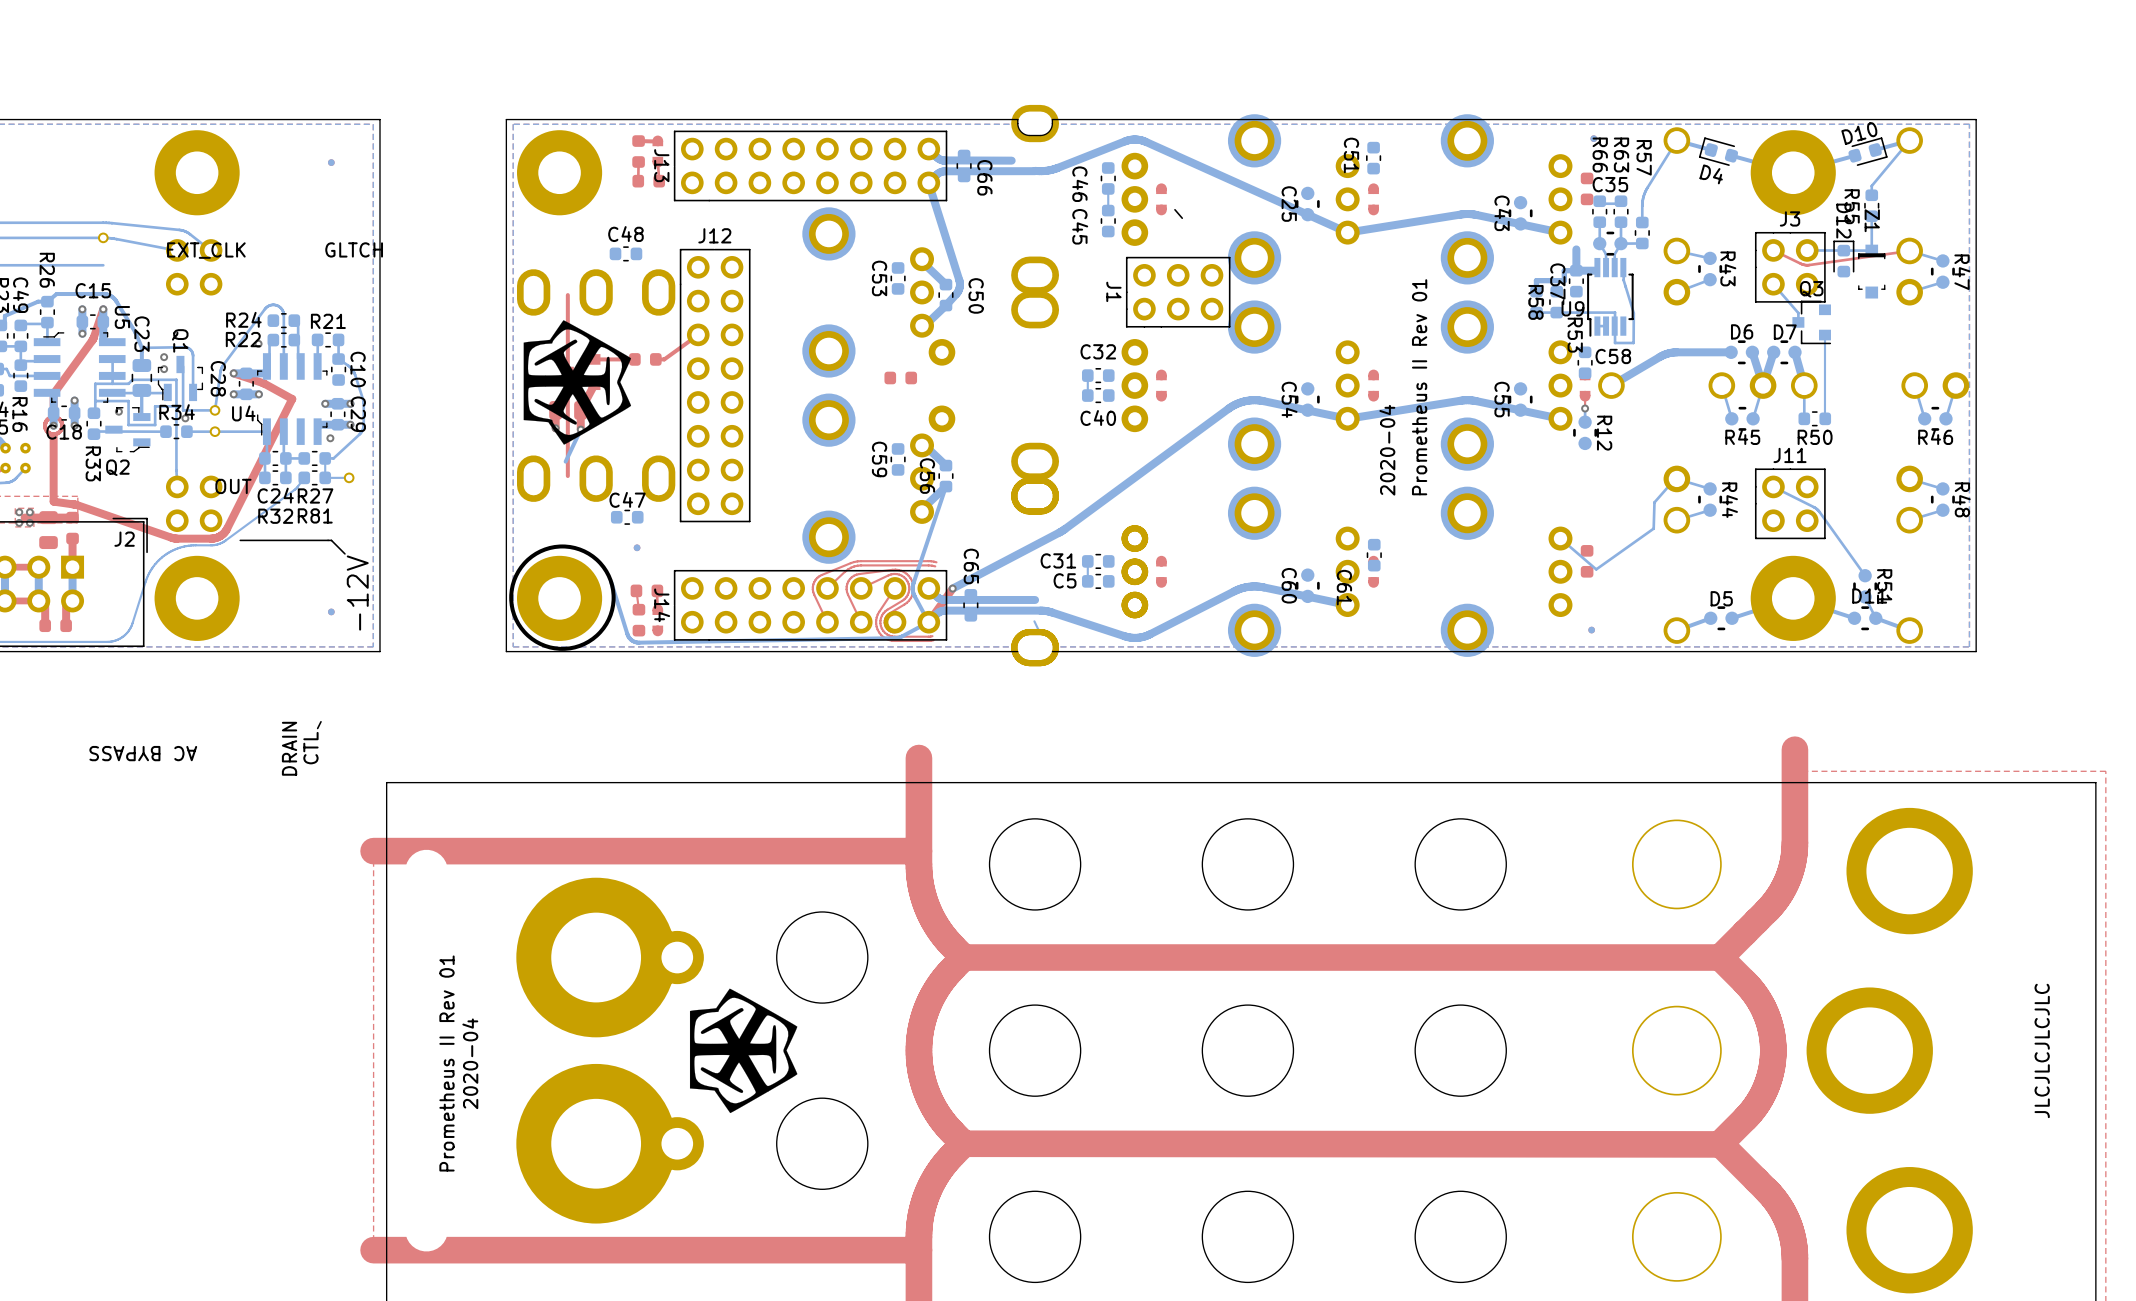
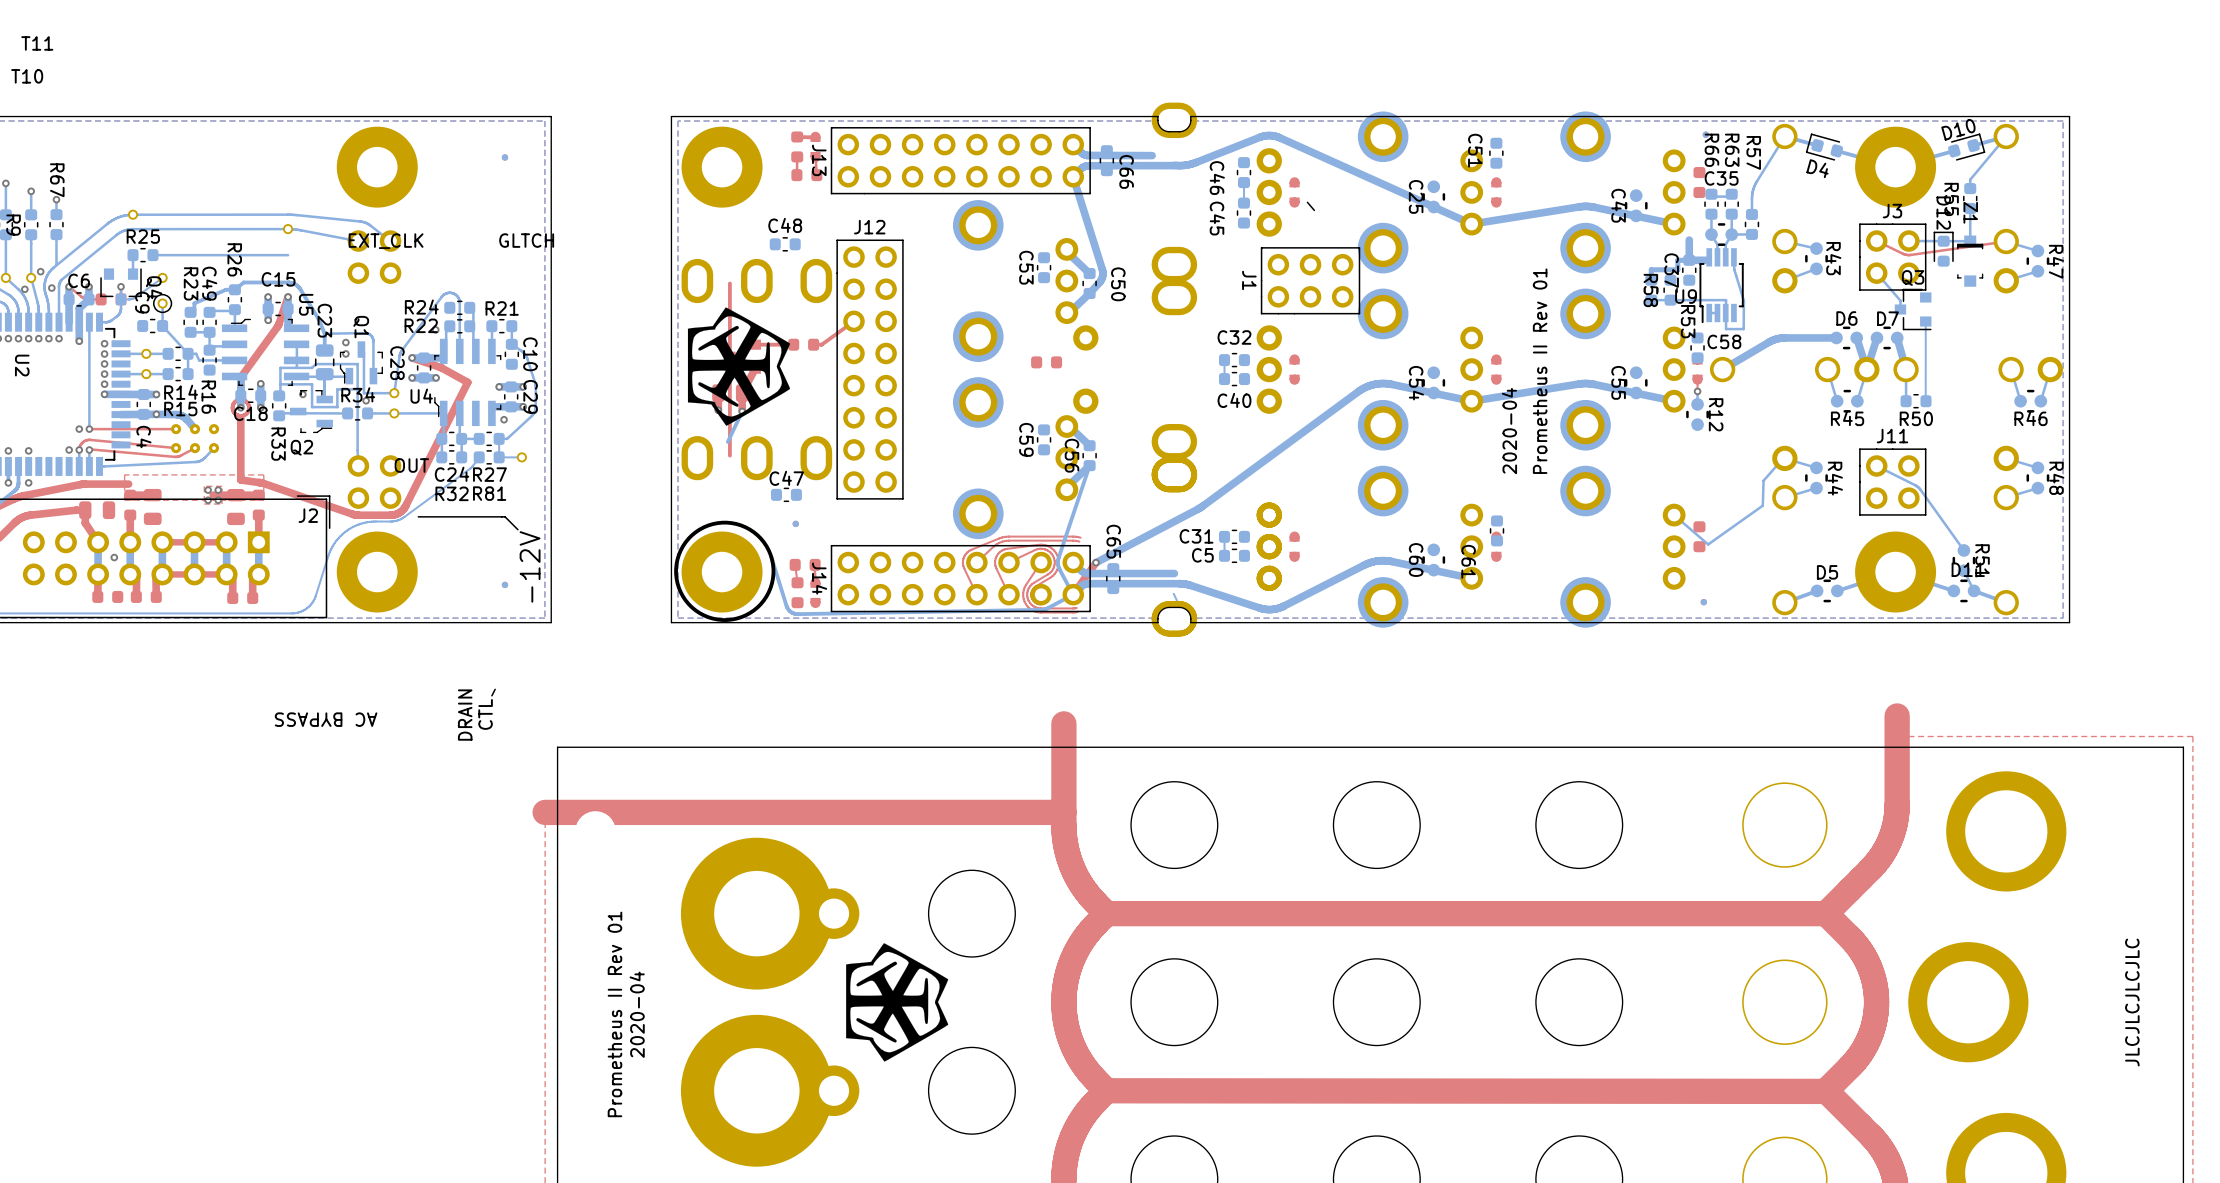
board edge: none -> (1190, 622) (1188, 611) (1179, 607) (1162, 609) (1158, 614) (1157, 622)

